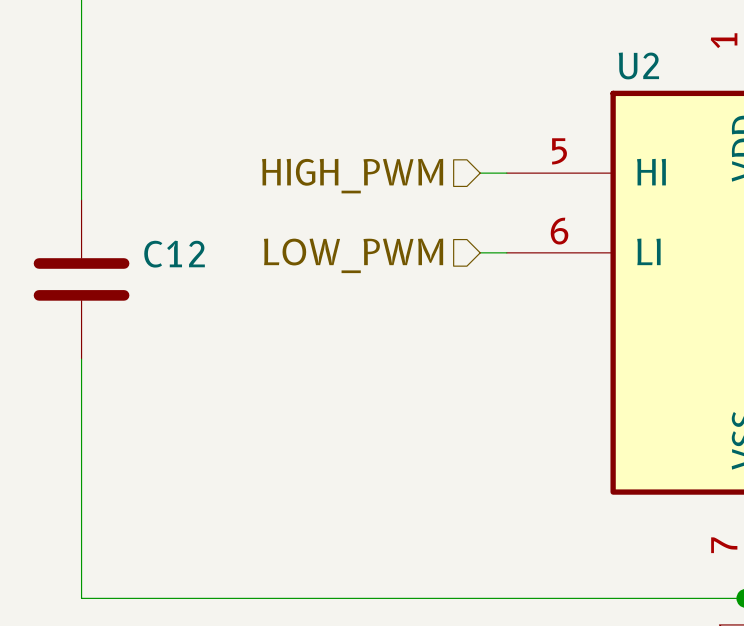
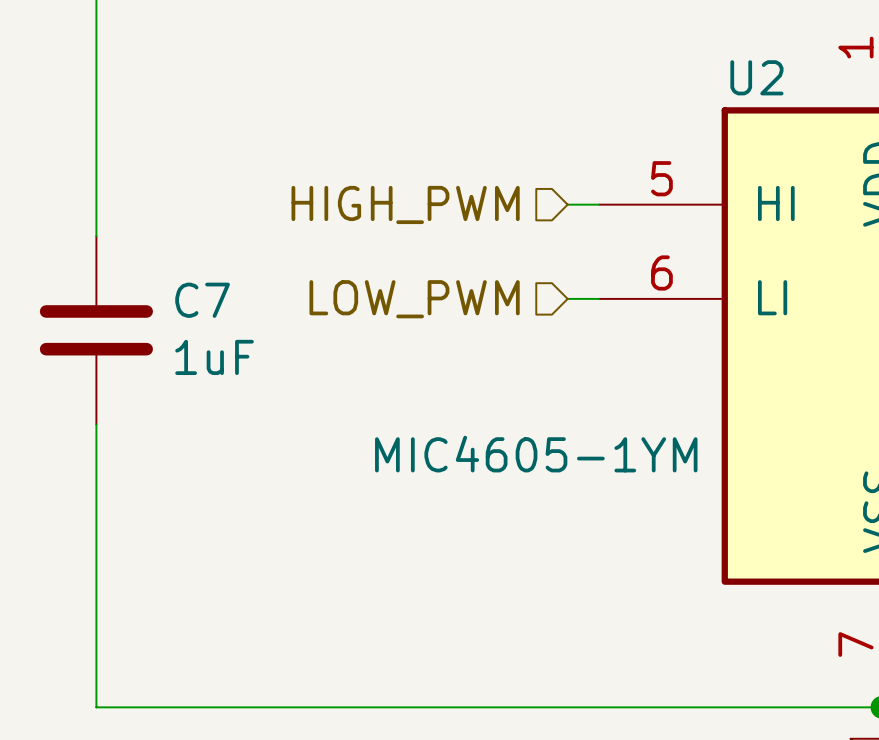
C12 name: C12 (174, 254) -> C7 (202, 300)
C12 value: none -> 1uF (214, 357)
U2 value: none -> MIC4605-1YM (536, 454)

